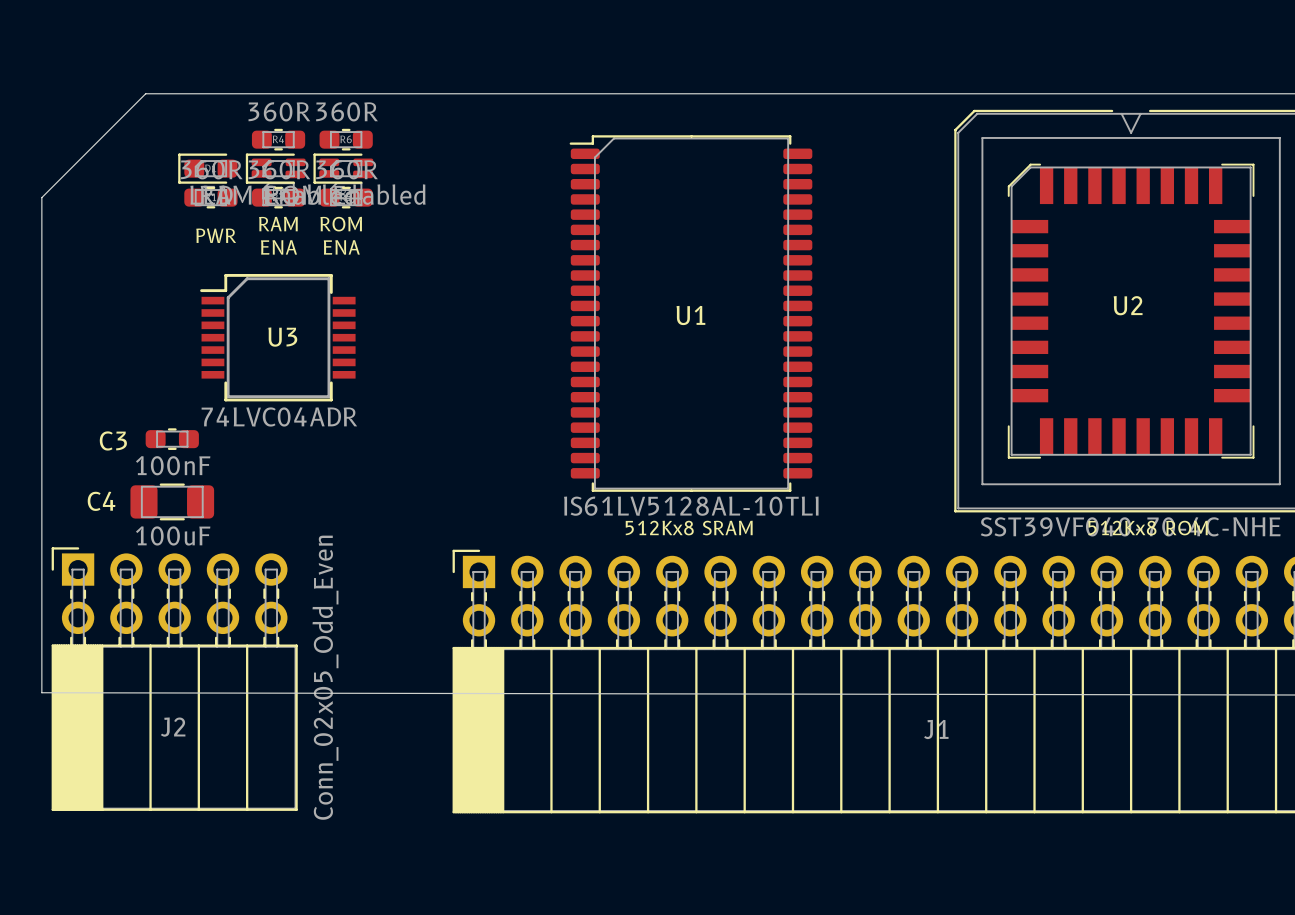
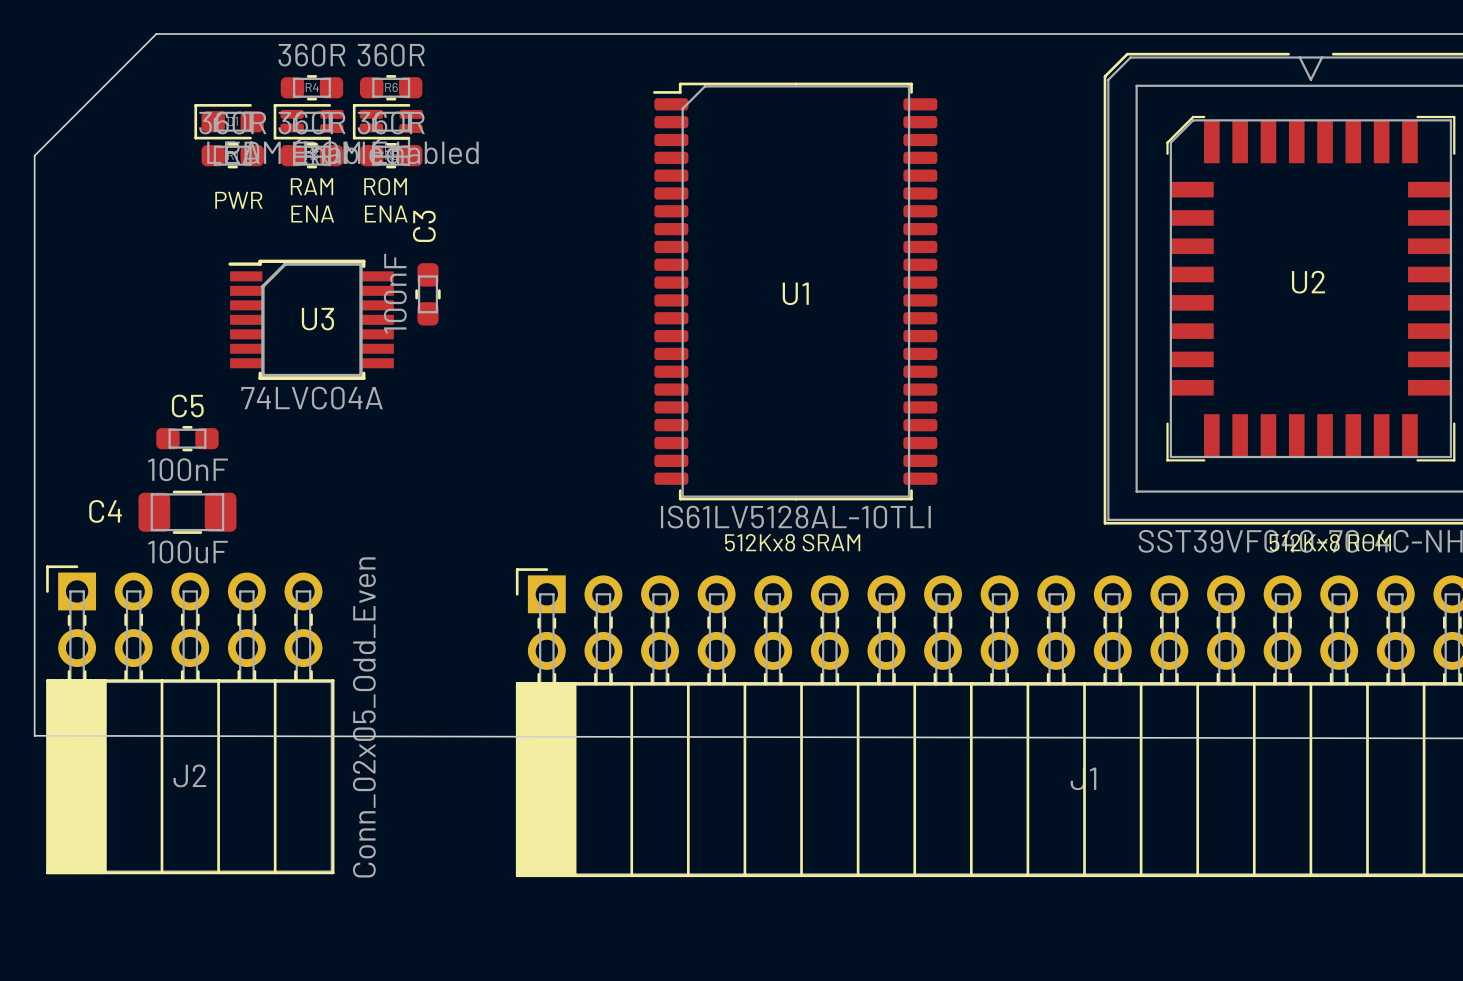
U3 footprint: [200, 273, 356, 402] -> [228, 259, 394, 380]
C3: none -> 100nF (427, 294)
U3 value: 74LVC04ADR (279, 416) -> 74LVC04A (311, 398)
C3 name: C3 (113, 440) -> C5 (187, 405)

